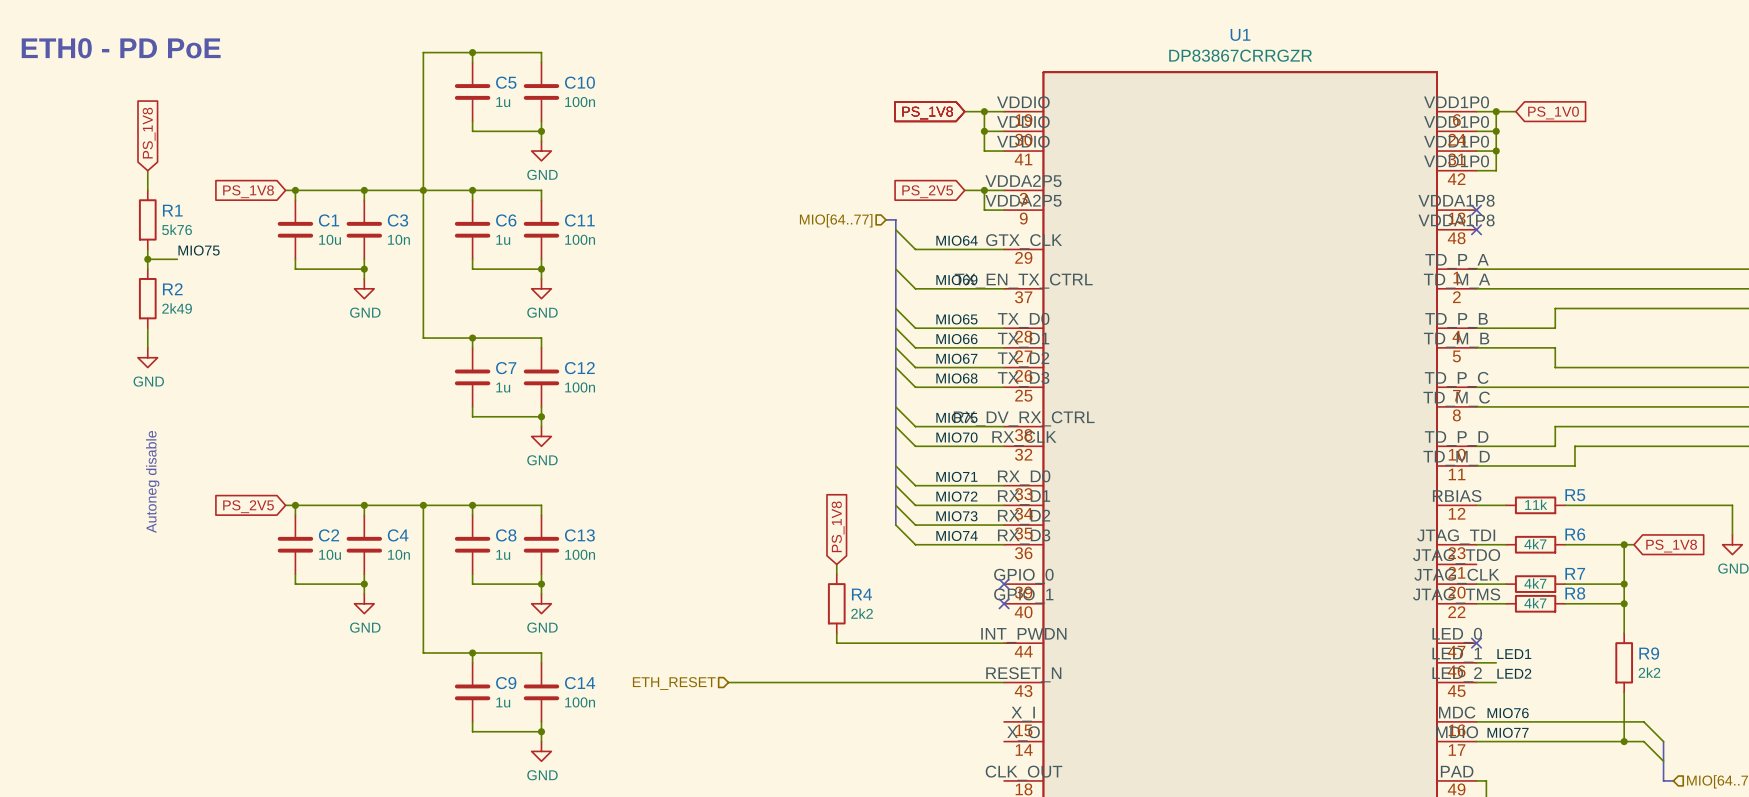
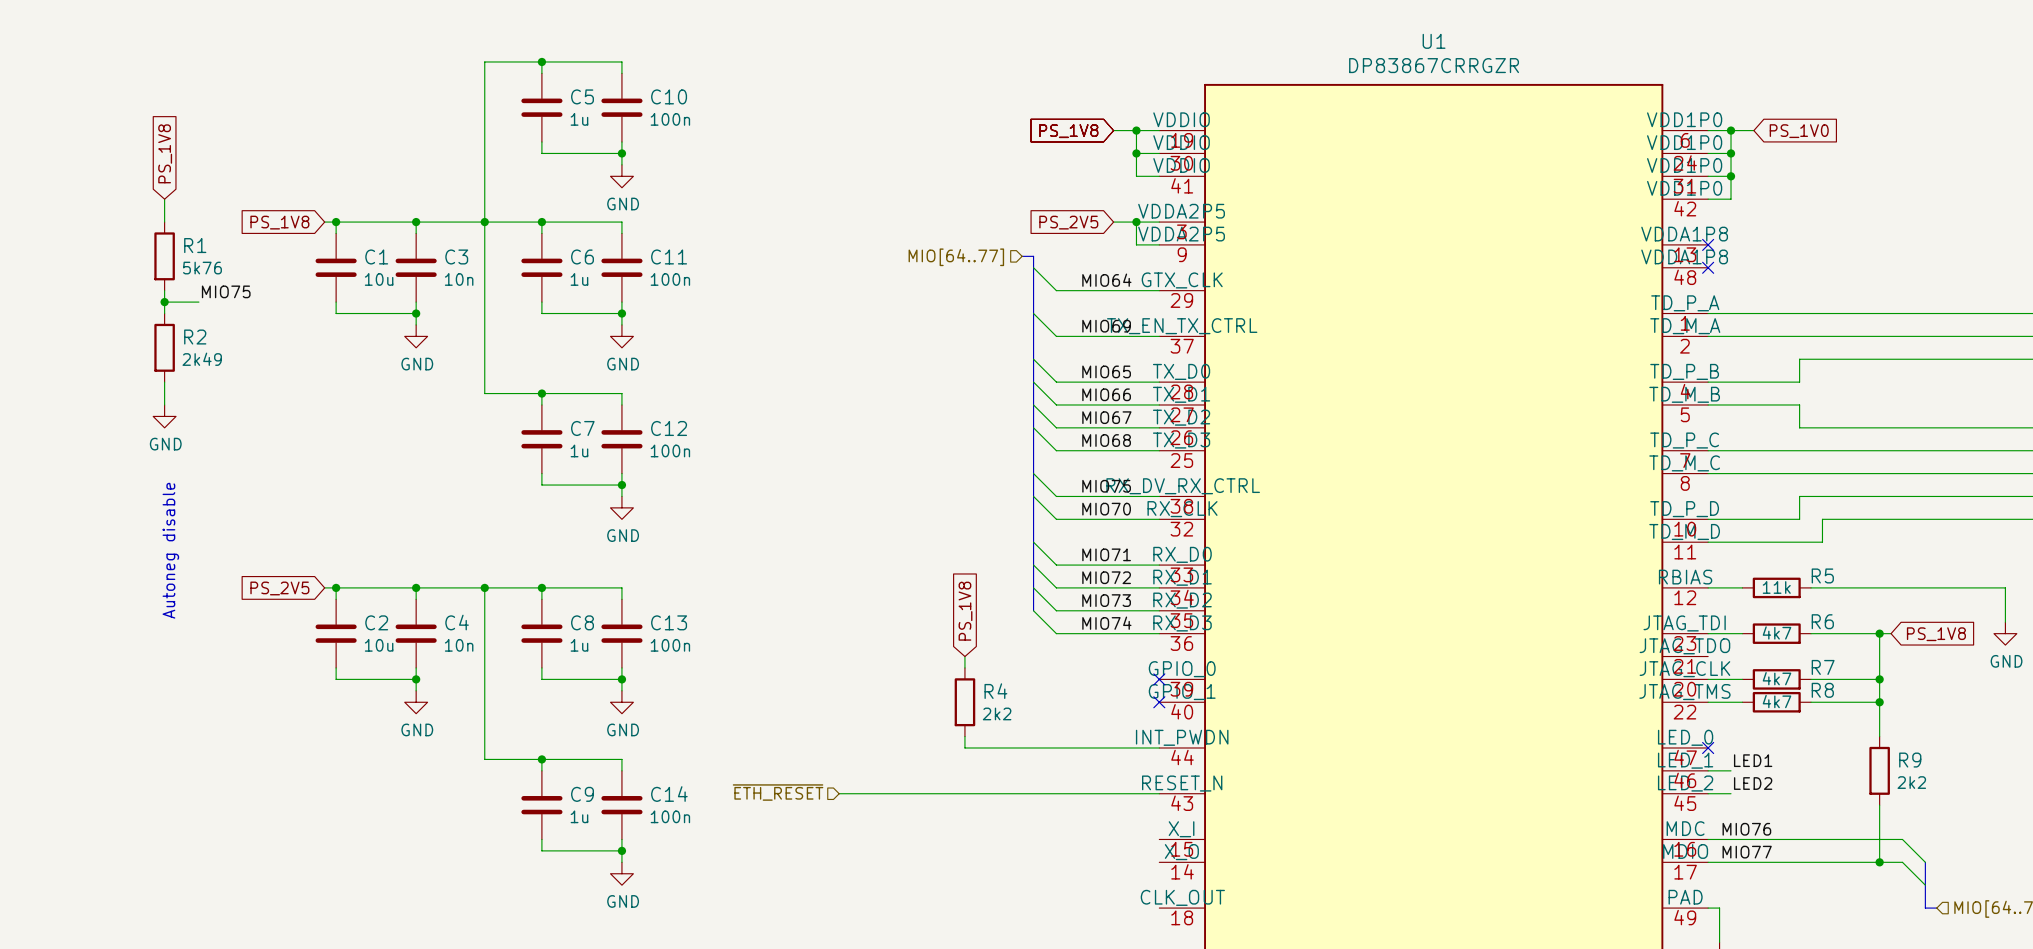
text: ETH0 - PD PoE (121, 48) -> none
hierarchical label: ETH_RESET (674, 683) -> ~{ETH_RESET} (778, 792)

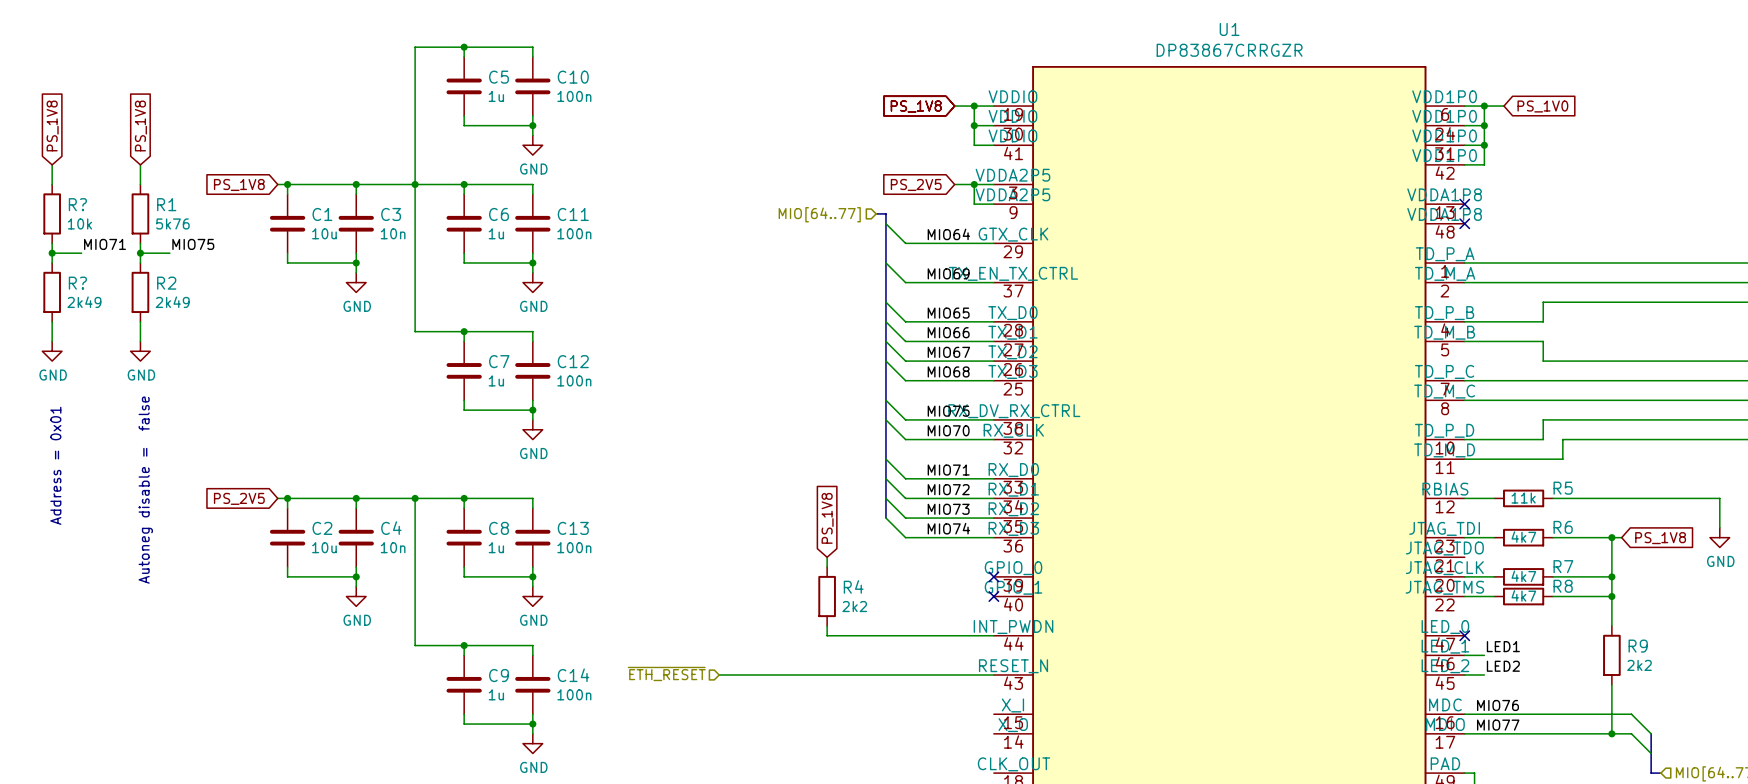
global label: none -> PS_1V8 (52, 125)
wire: none -> (52, 164) (52, 184)
R?: none -> (52, 213)
wire: none -> (52, 243) (52, 262)
label: none -> MIO71 (105, 244)
wire: none -> (52, 253) (81, 253)
junction: none -> (52, 253)
R?: none -> (52, 292)
wire: none -> (52, 321) (52, 341)
power symbol: none -> GND (52, 351)
text: none -> Address = 0x01 (55, 465)
text: Autoneg disable (170, 550) -> Autoneg disable = false (145, 490)

